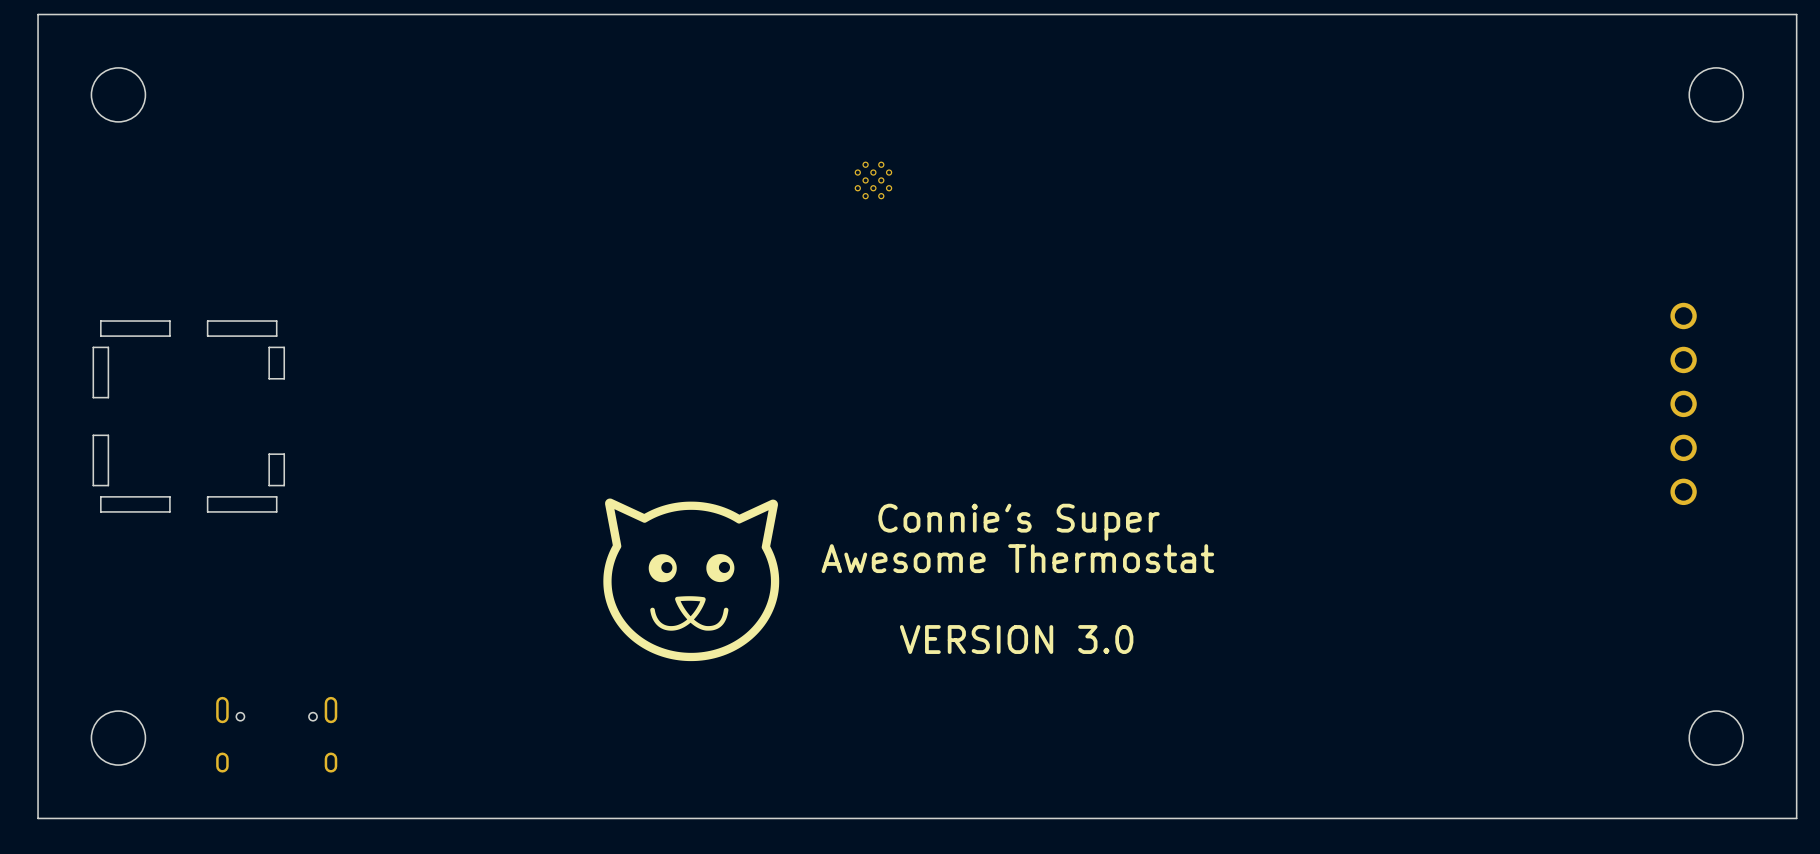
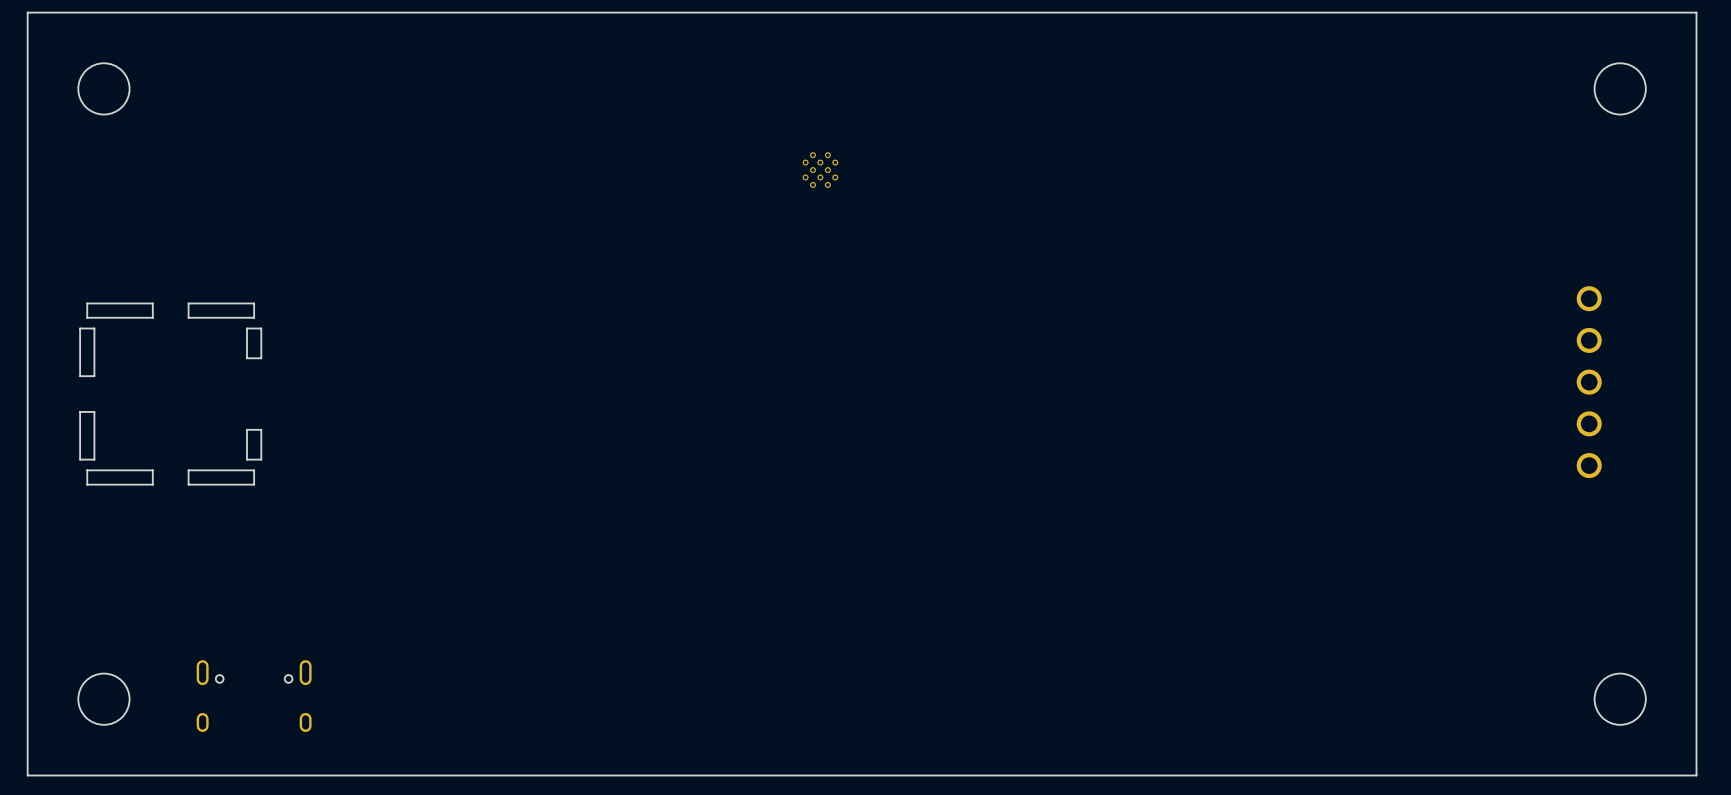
drawing: [603, 498, 780, 662] -> none
text: Connie's Super (1019, 522) -> none
text: Awesome Thermostat (1017, 558) -> none
text: VERSION 3.0 (1016, 639) -> none

